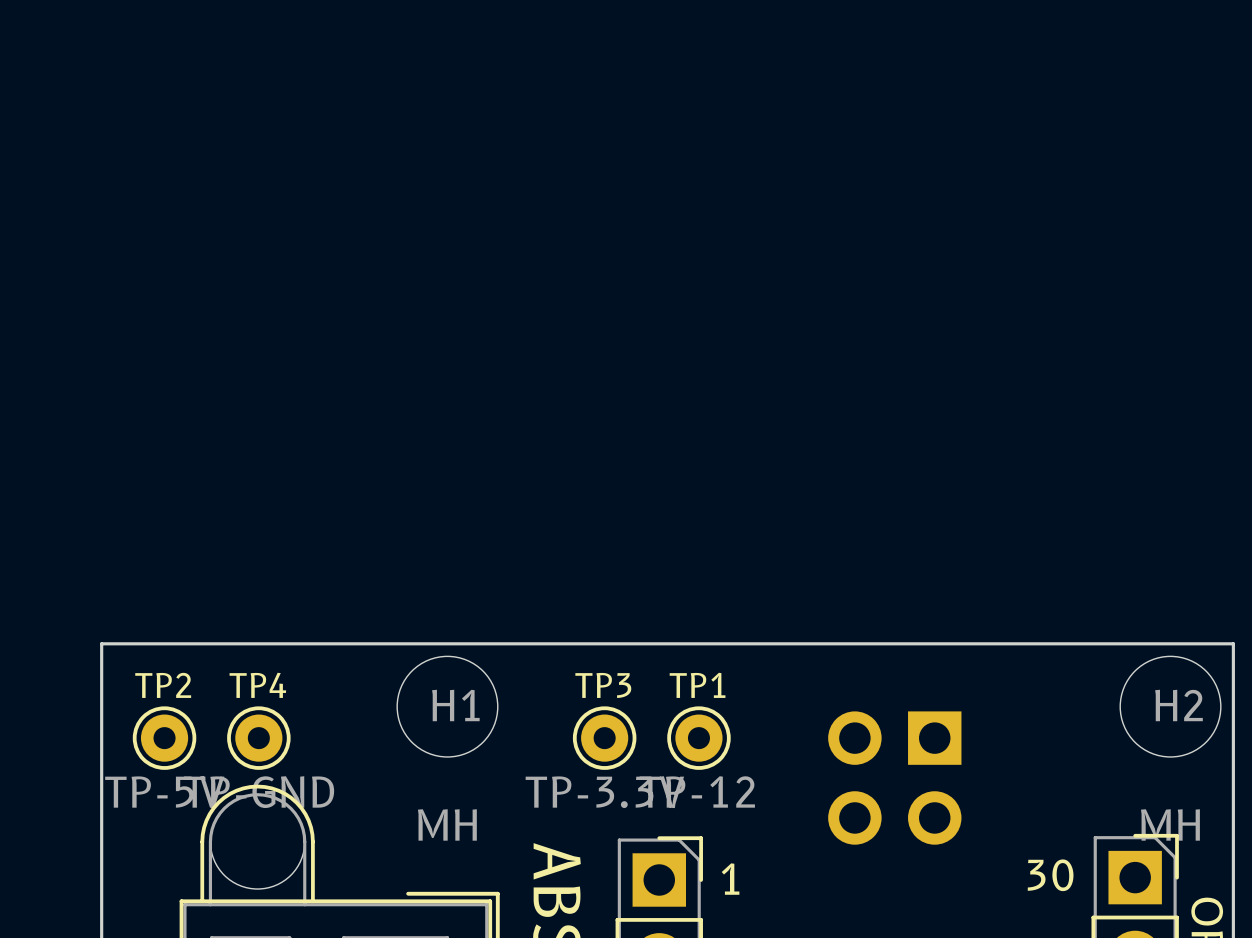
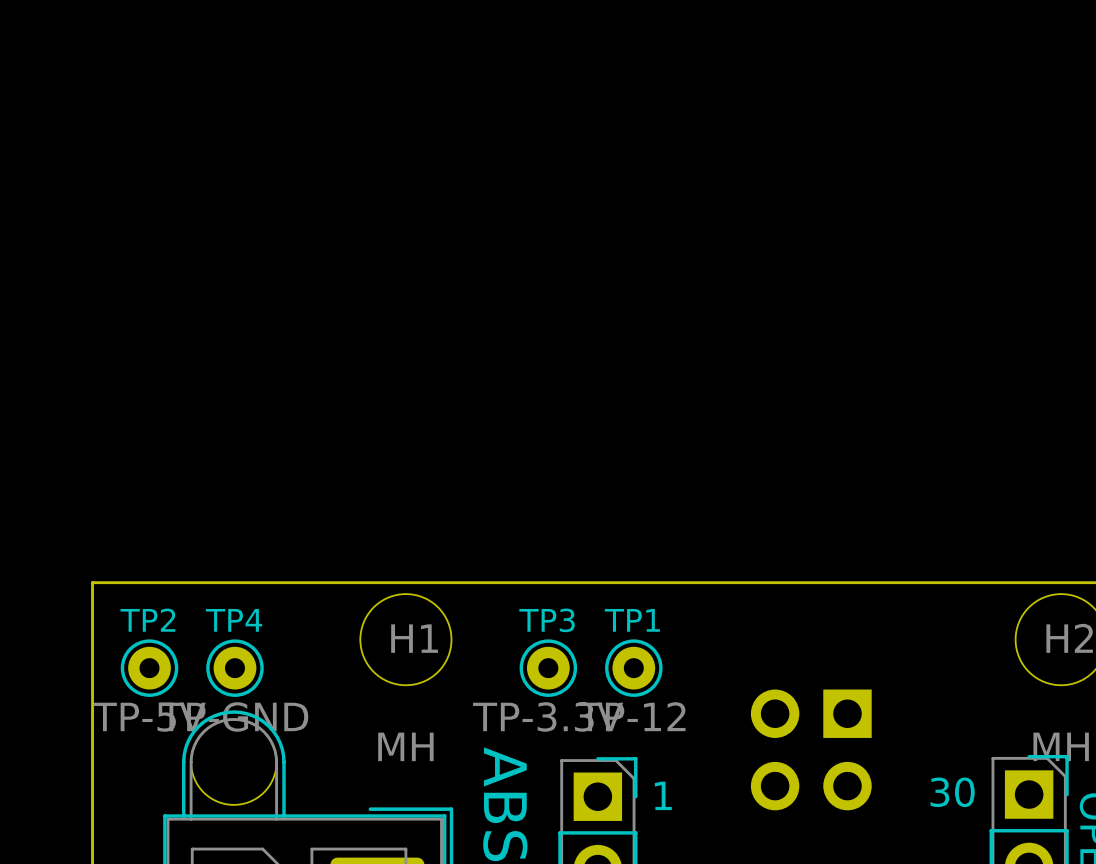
part position: (894, 778) -> (811, 749)

